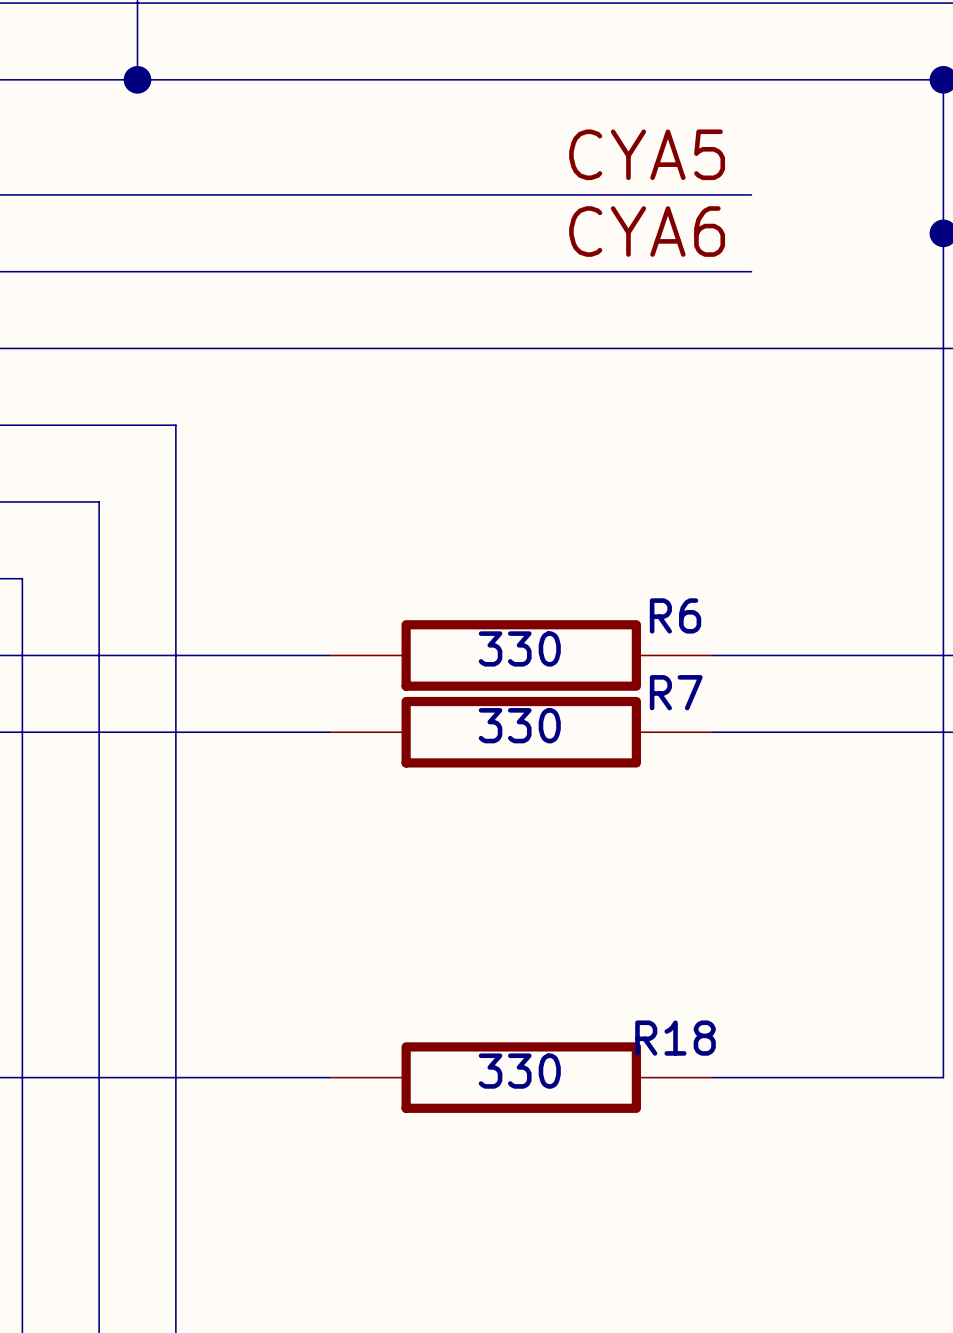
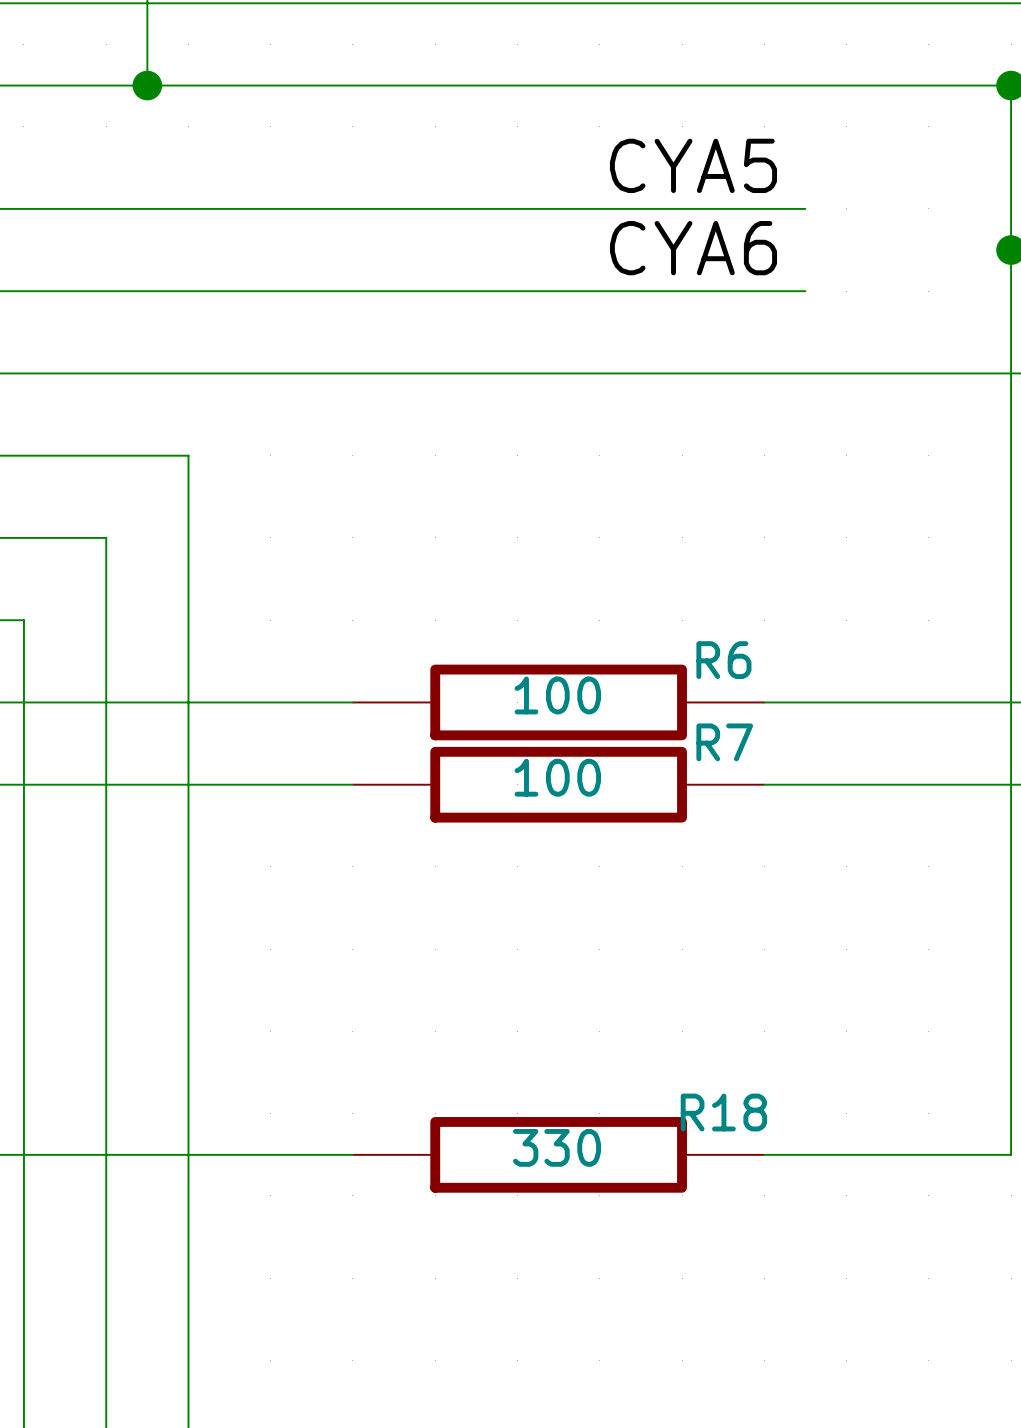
R6 value: 330 (519, 648) -> 100 (557, 695)
R7 value: 330 (519, 725) -> 100 (557, 777)

